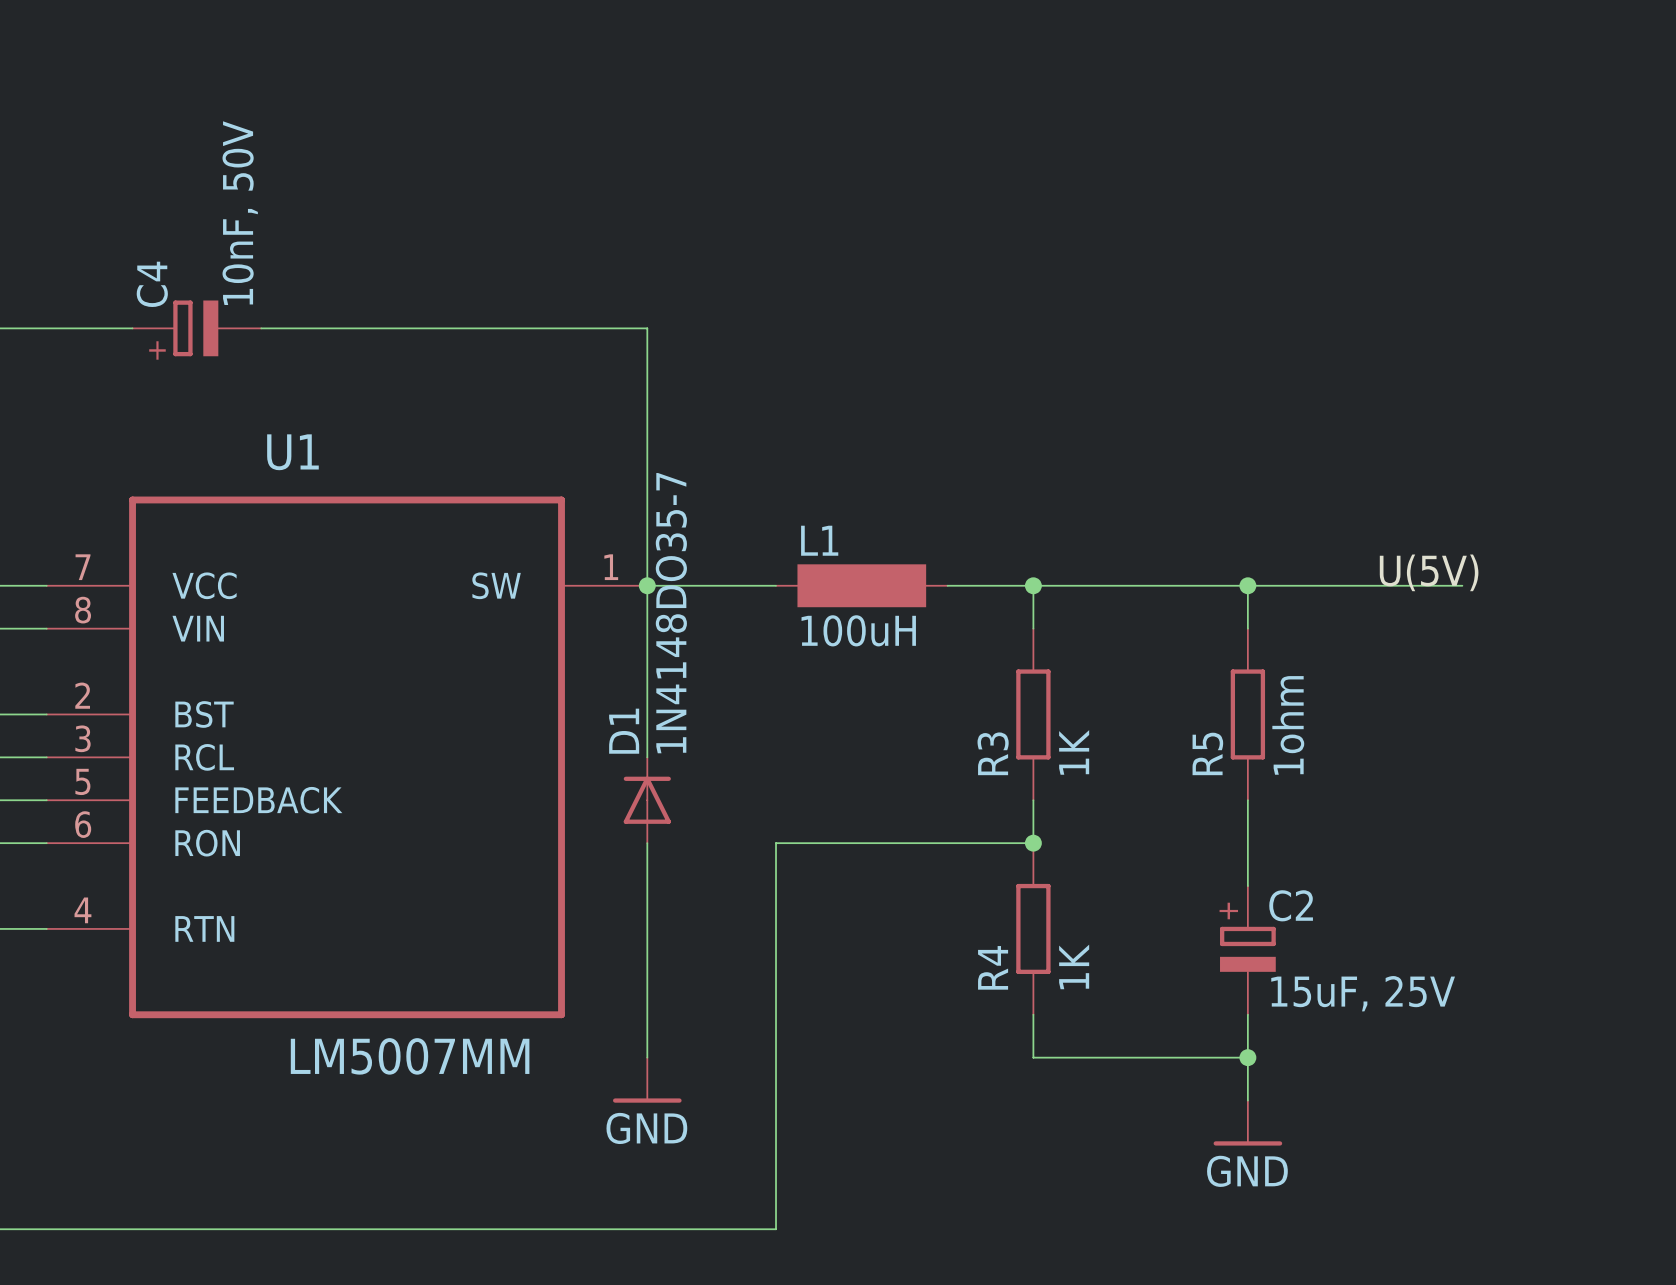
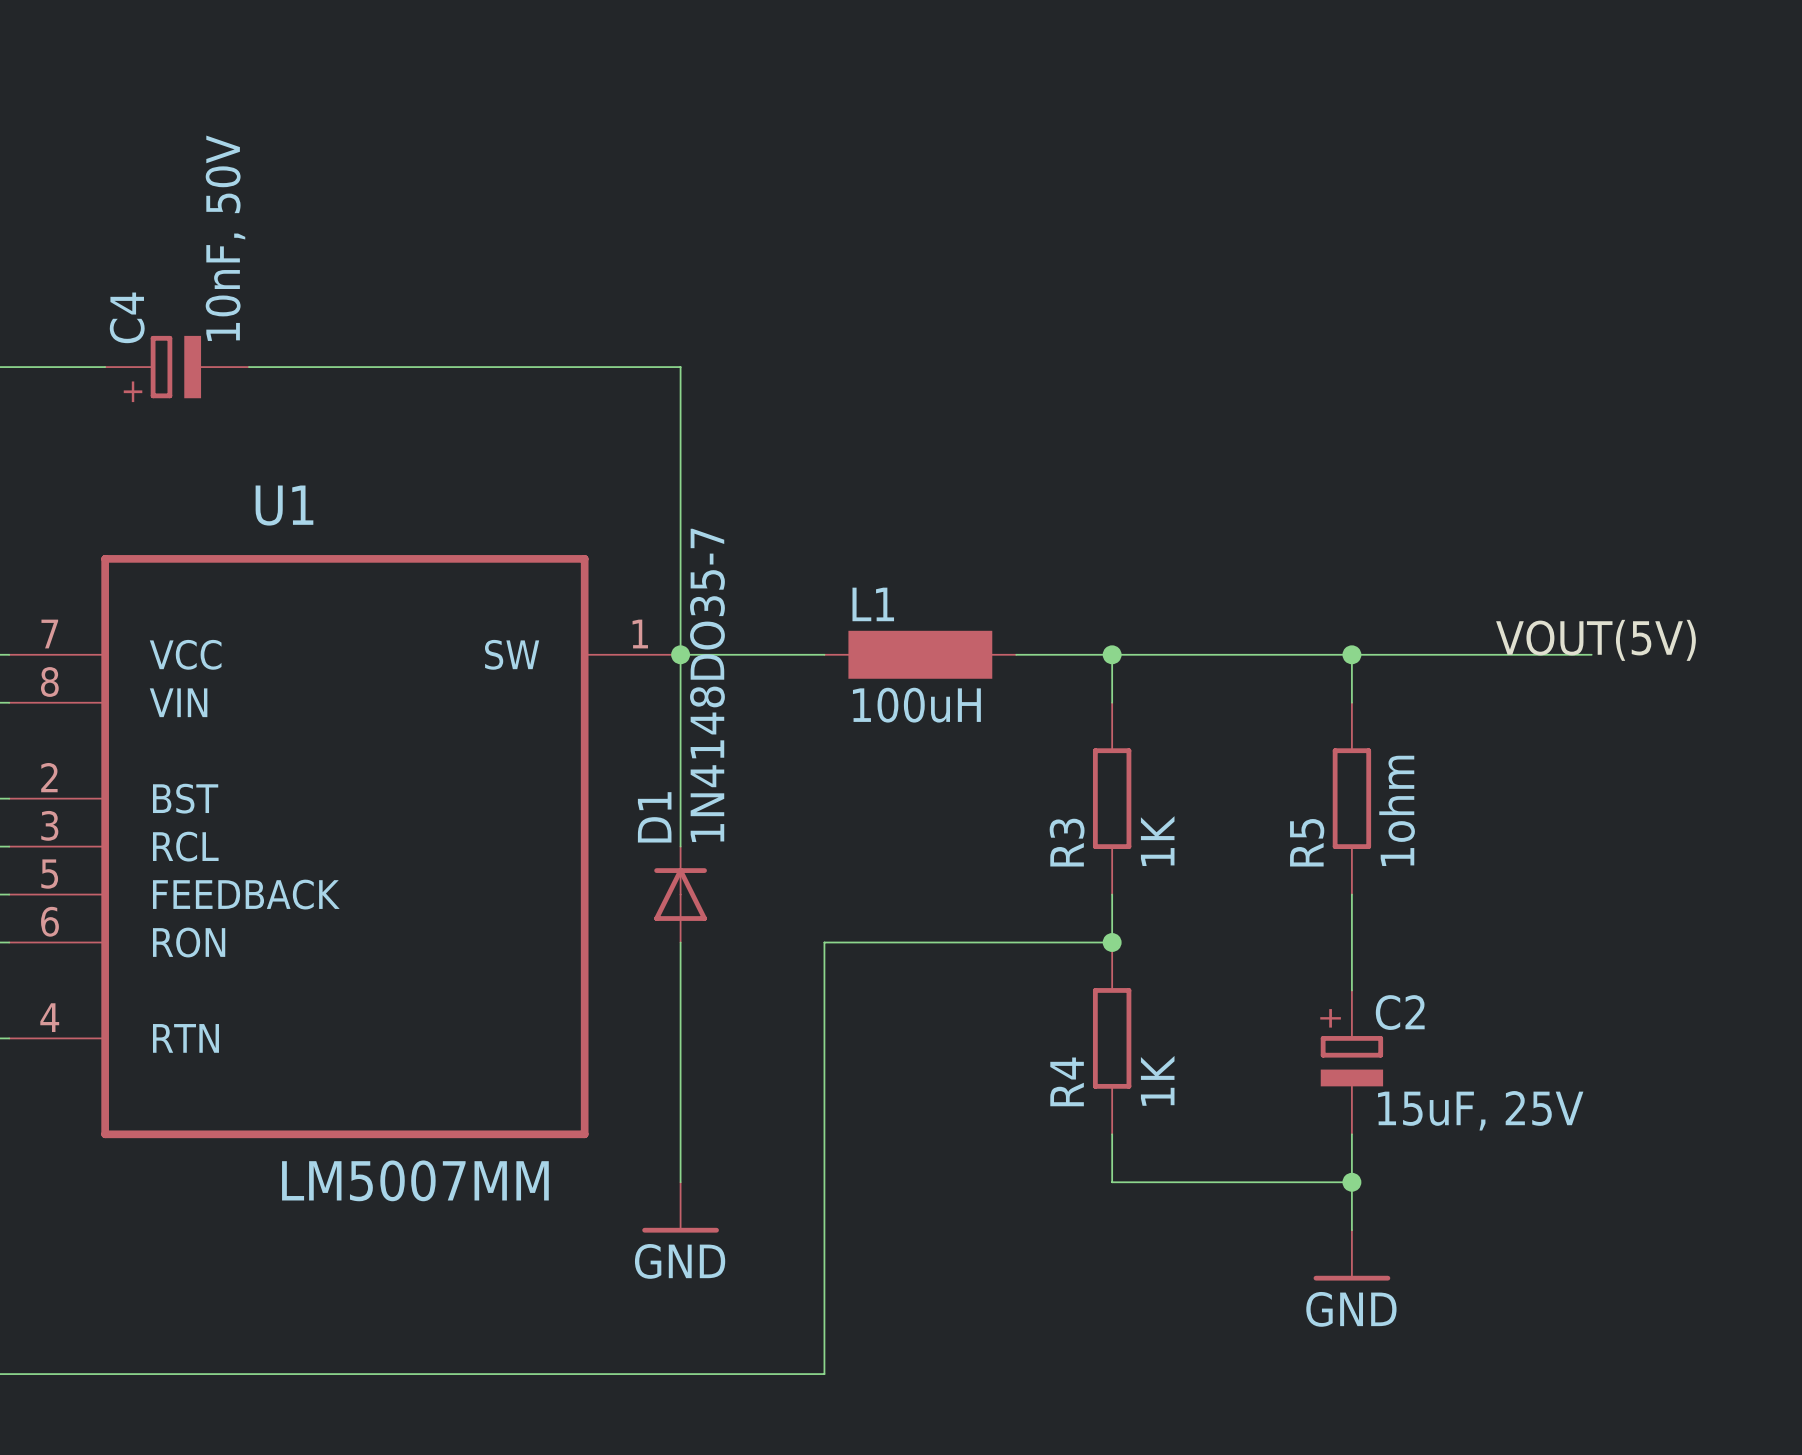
label: U(5V) (1429, 572) -> VOUT(5V) (1595, 640)

